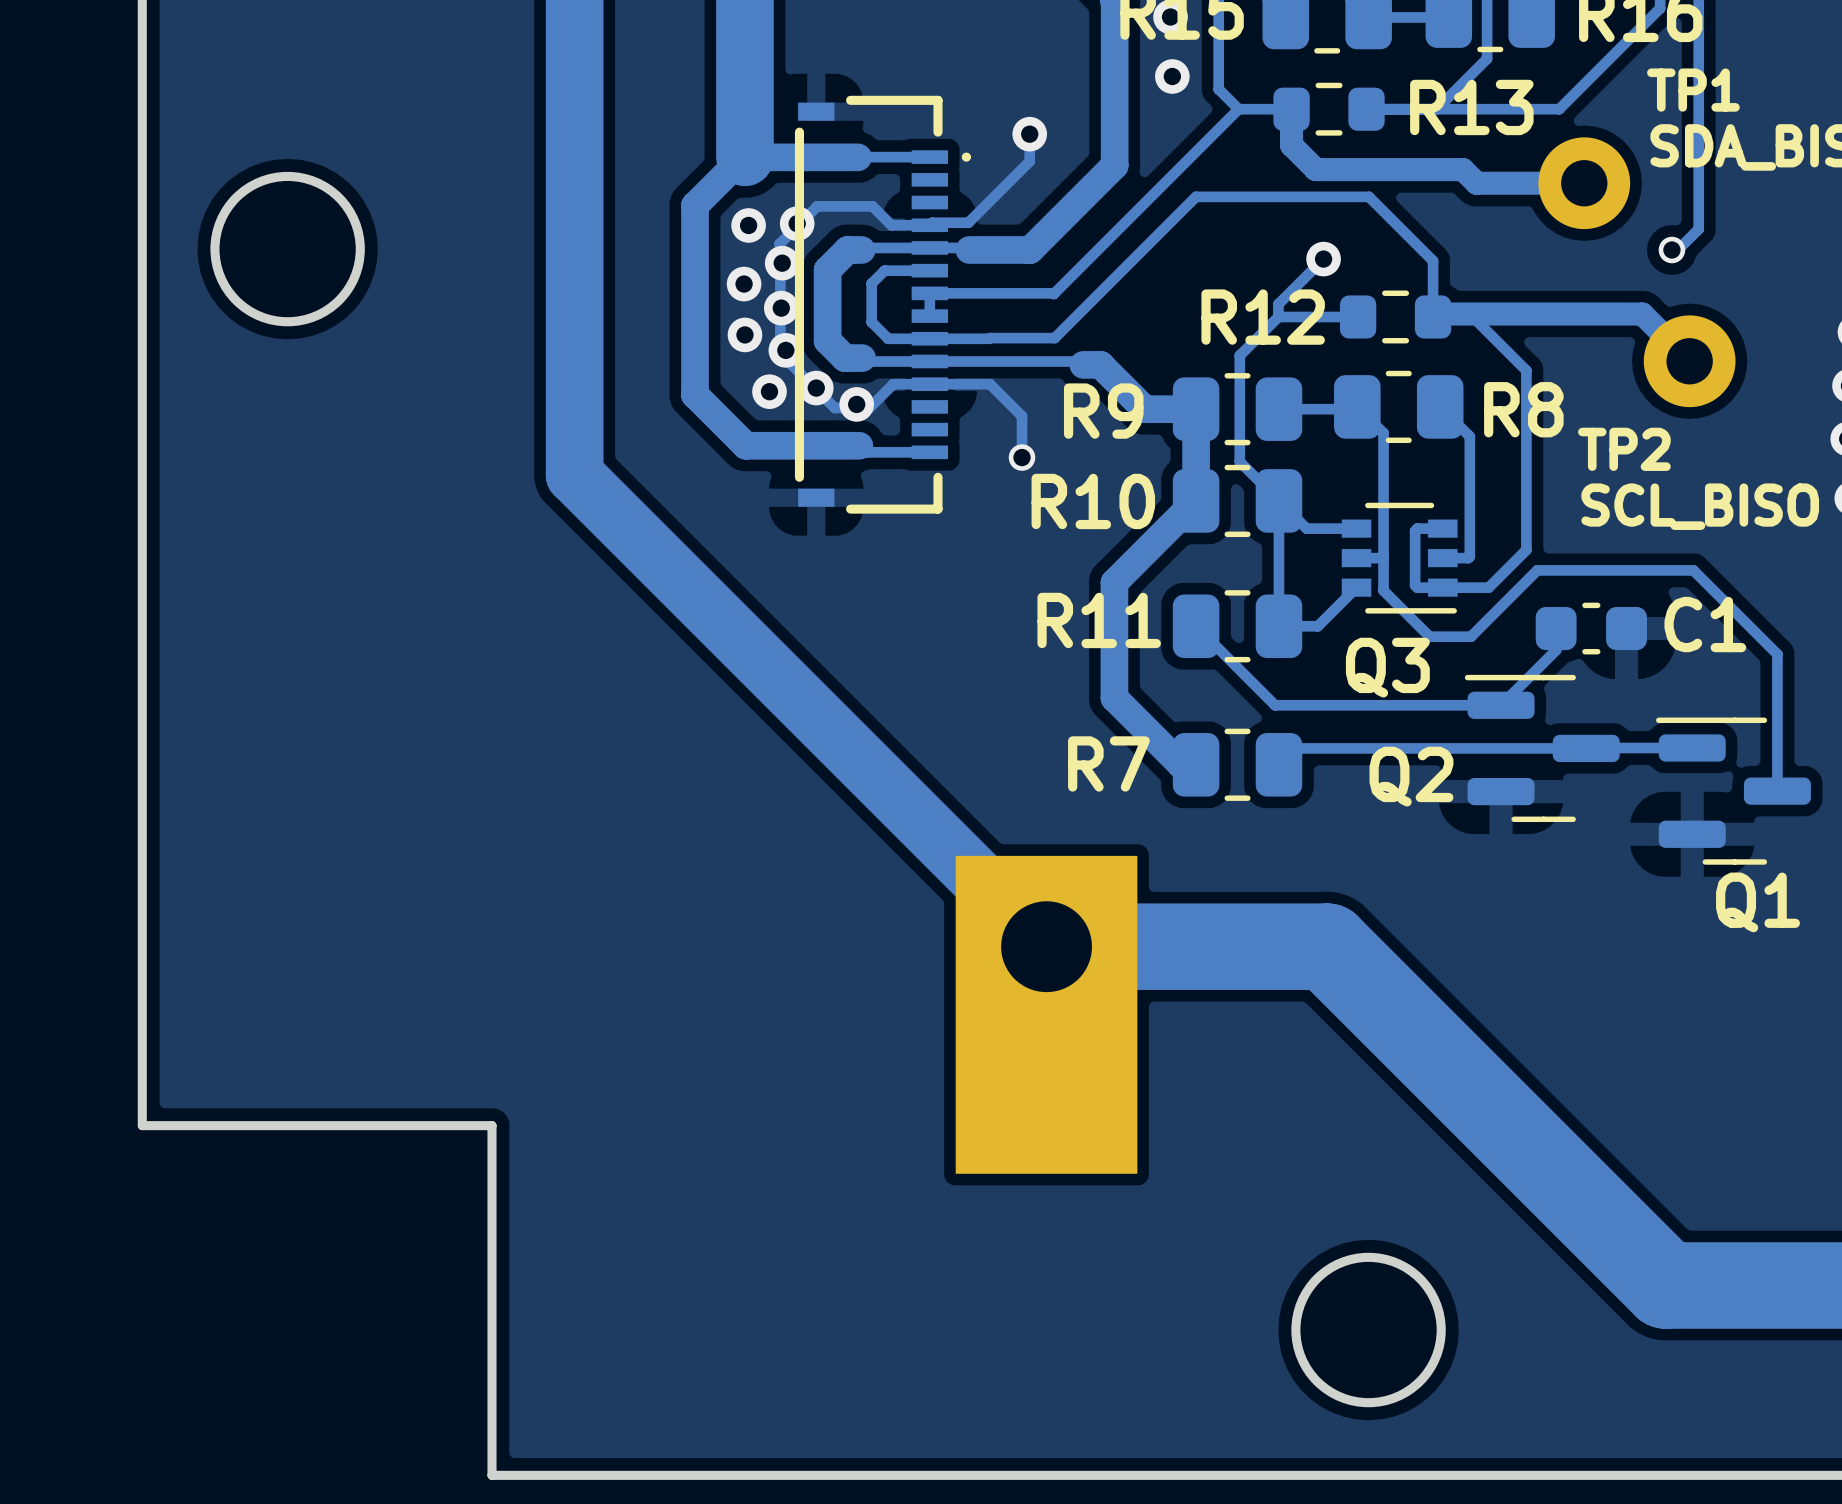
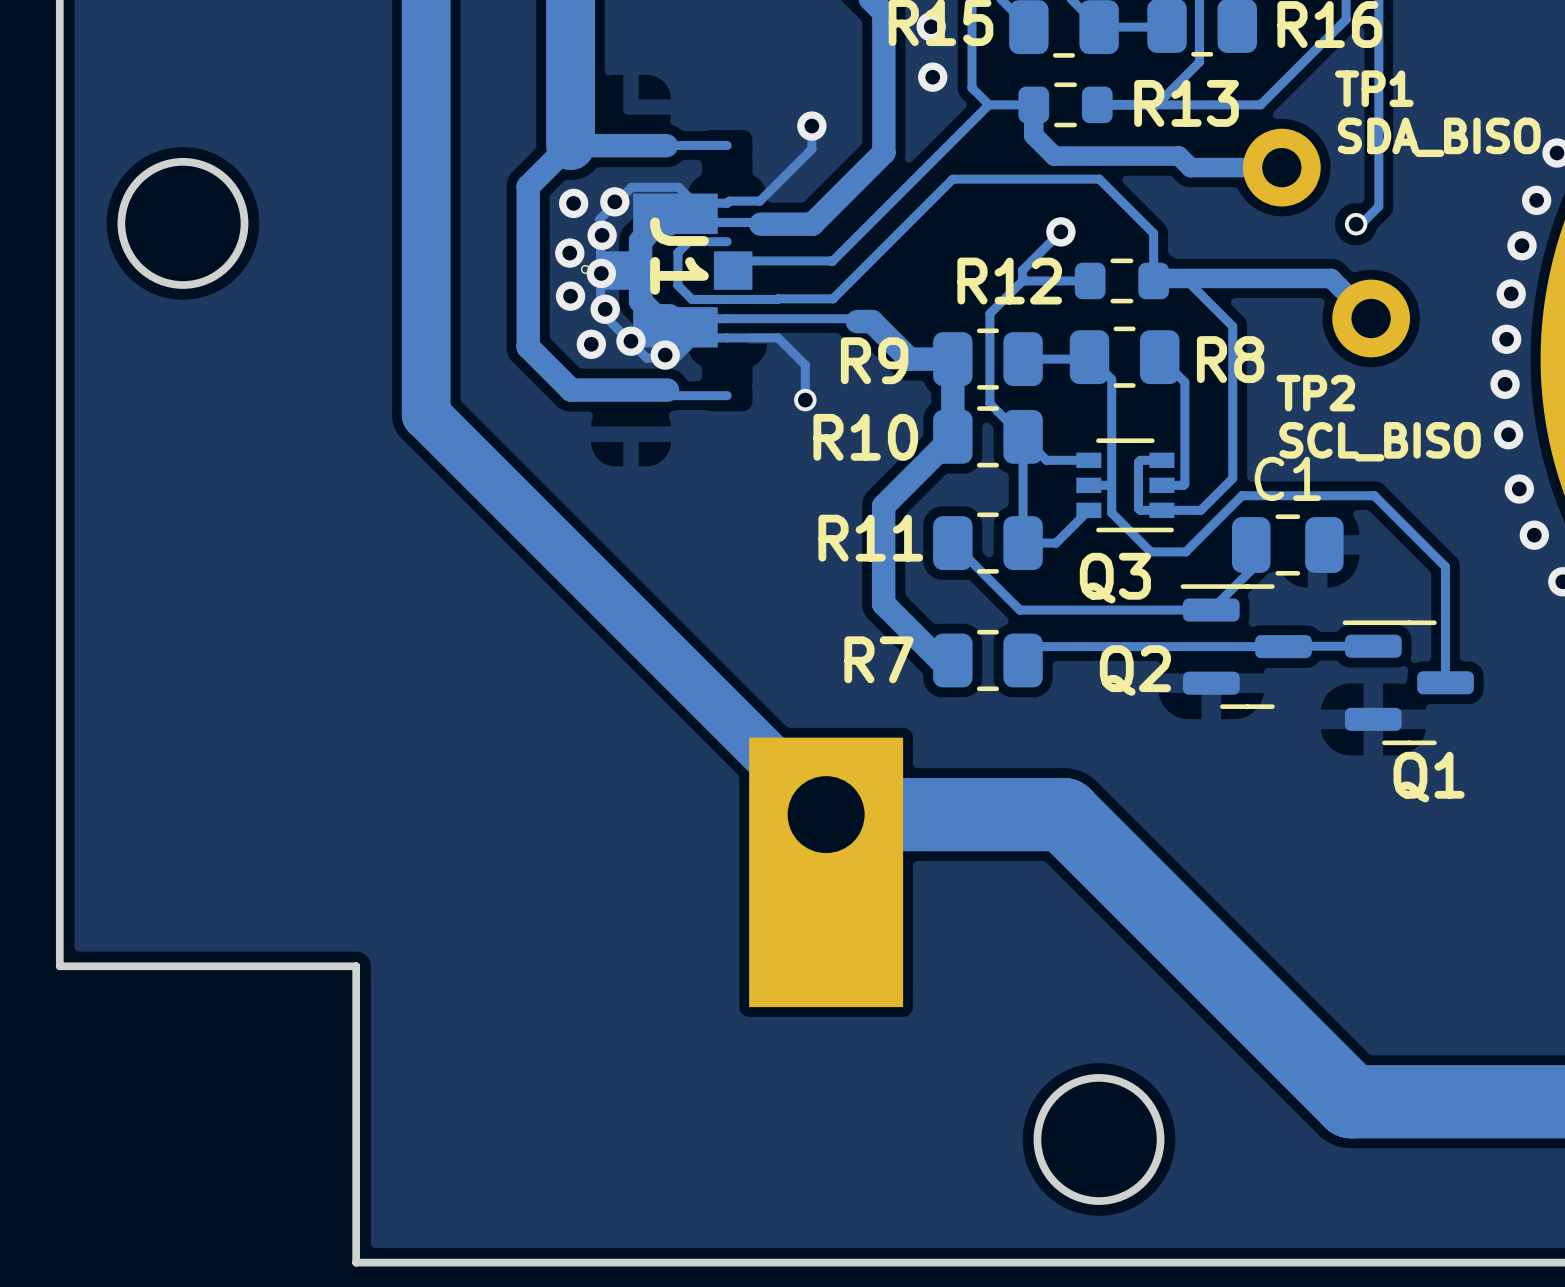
J1: none -> (666, 270)
part: (882, 304) -> none
C1 footprint: [1535, 602, 1647, 655] -> [1231, 514, 1344, 576]
C1 name position: C1 (1705, 624) -> C1 (1287, 478)

